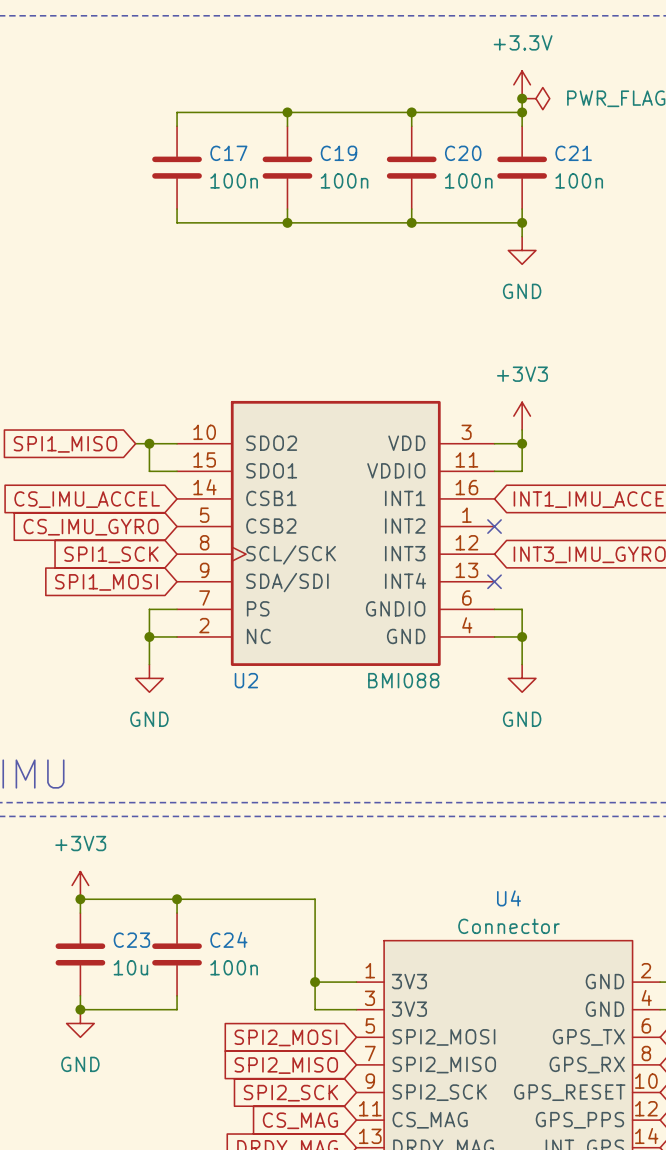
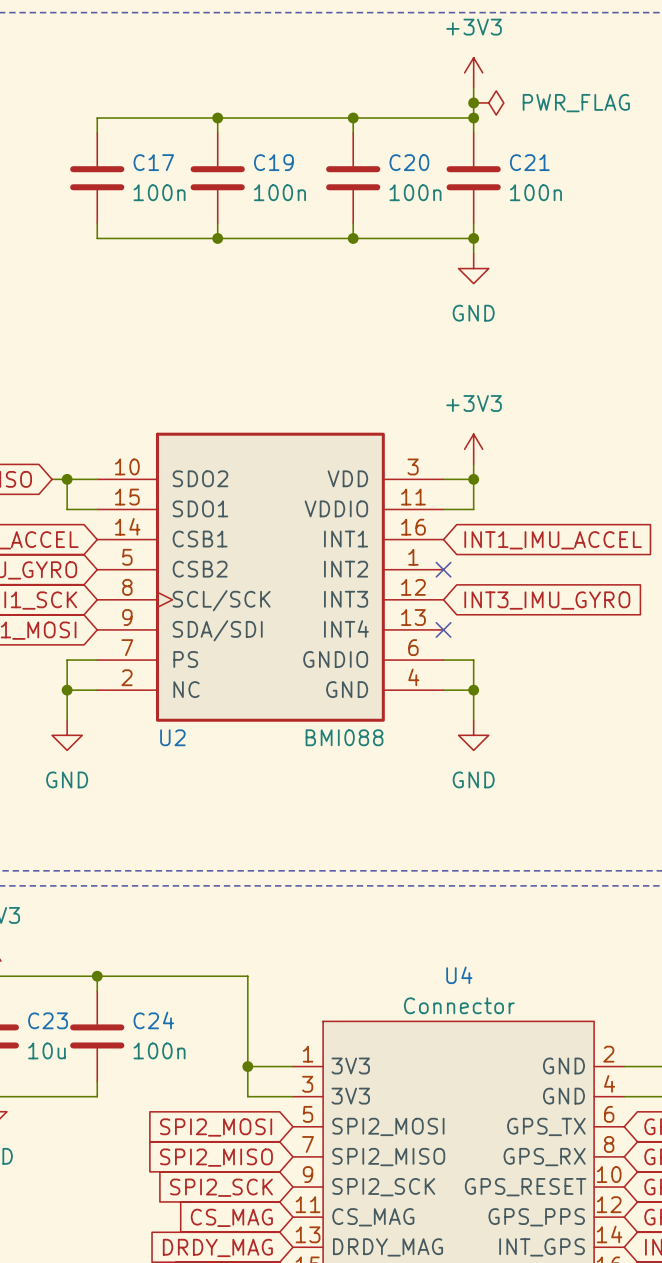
power symbol: none -> +3V3 (473, 72)
power symbol: +3.3V (522, 84) -> none

